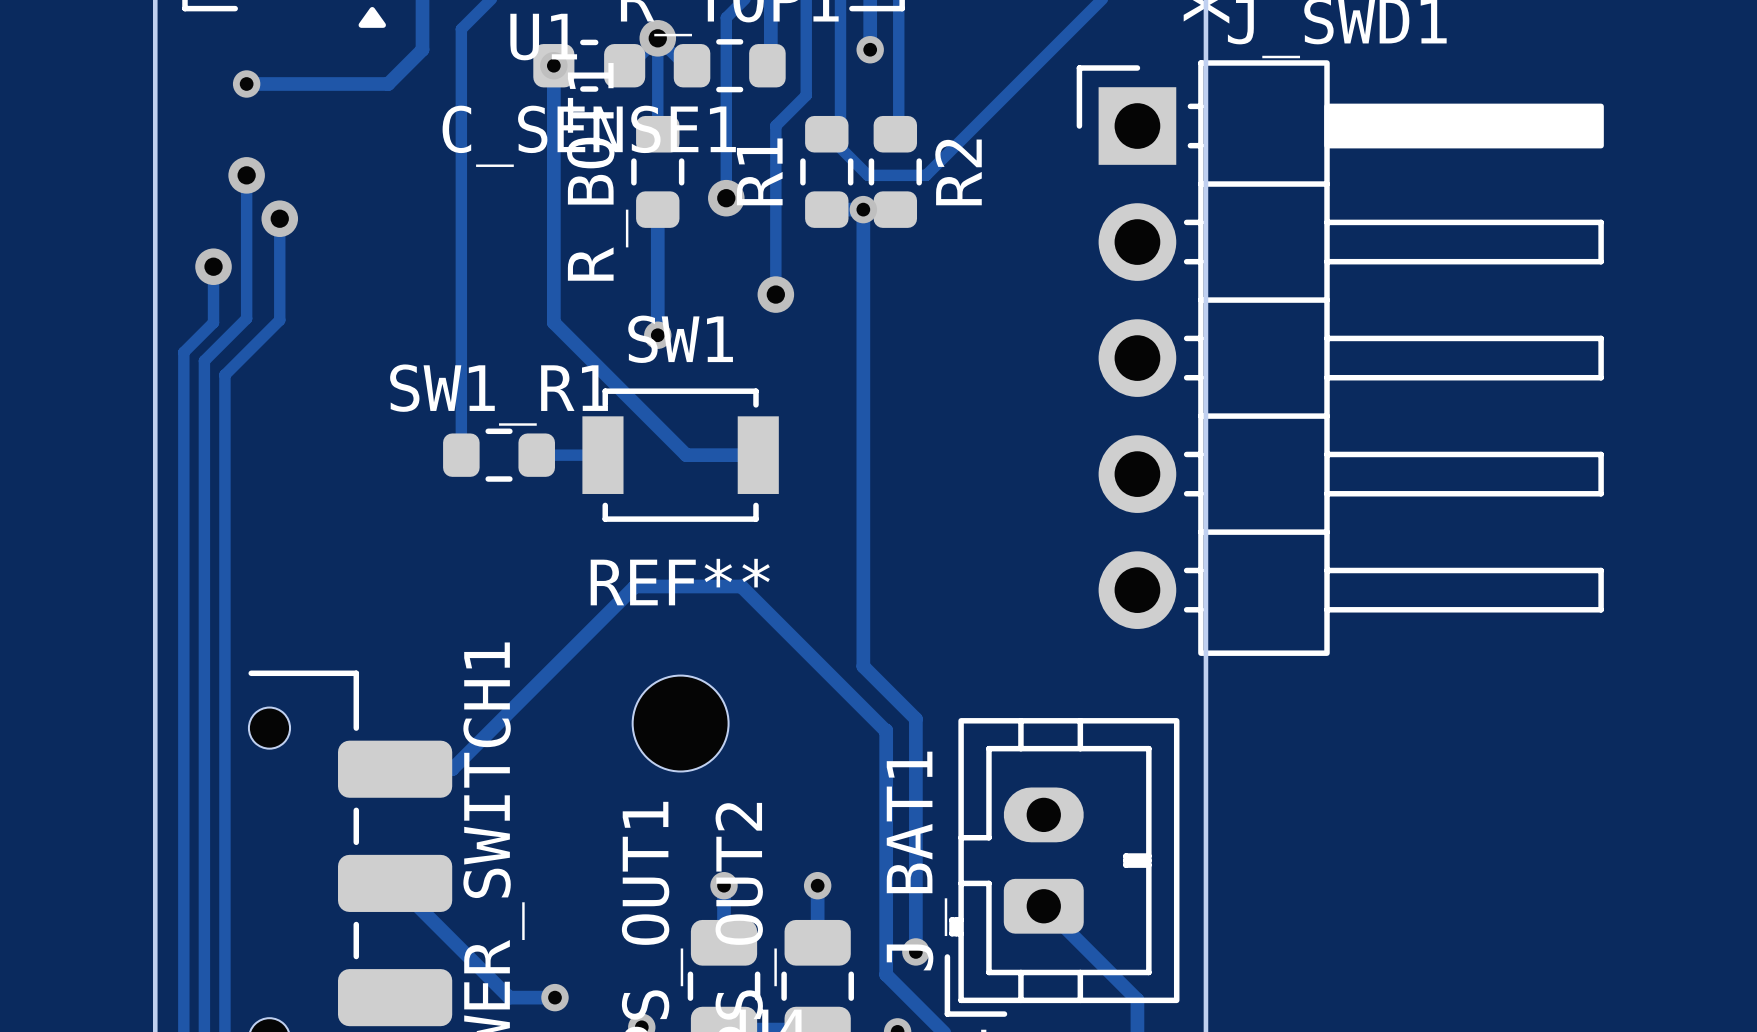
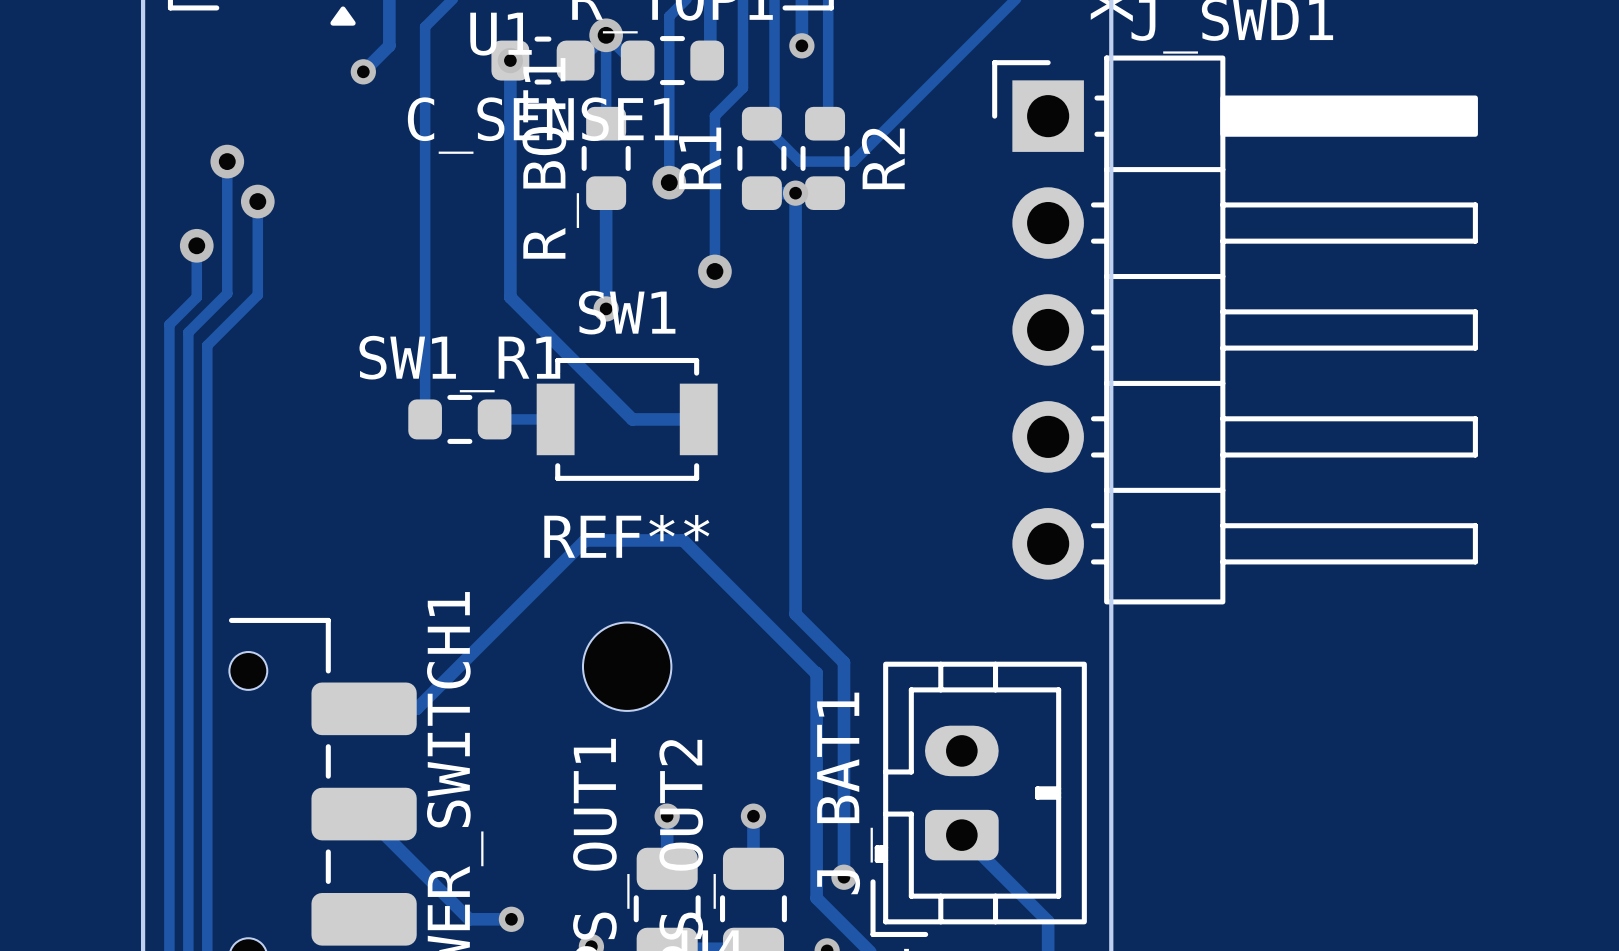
track: (394, 77) (388, 83) (246, 83) -> none
via position: (246, 83) -> (363, 71)

